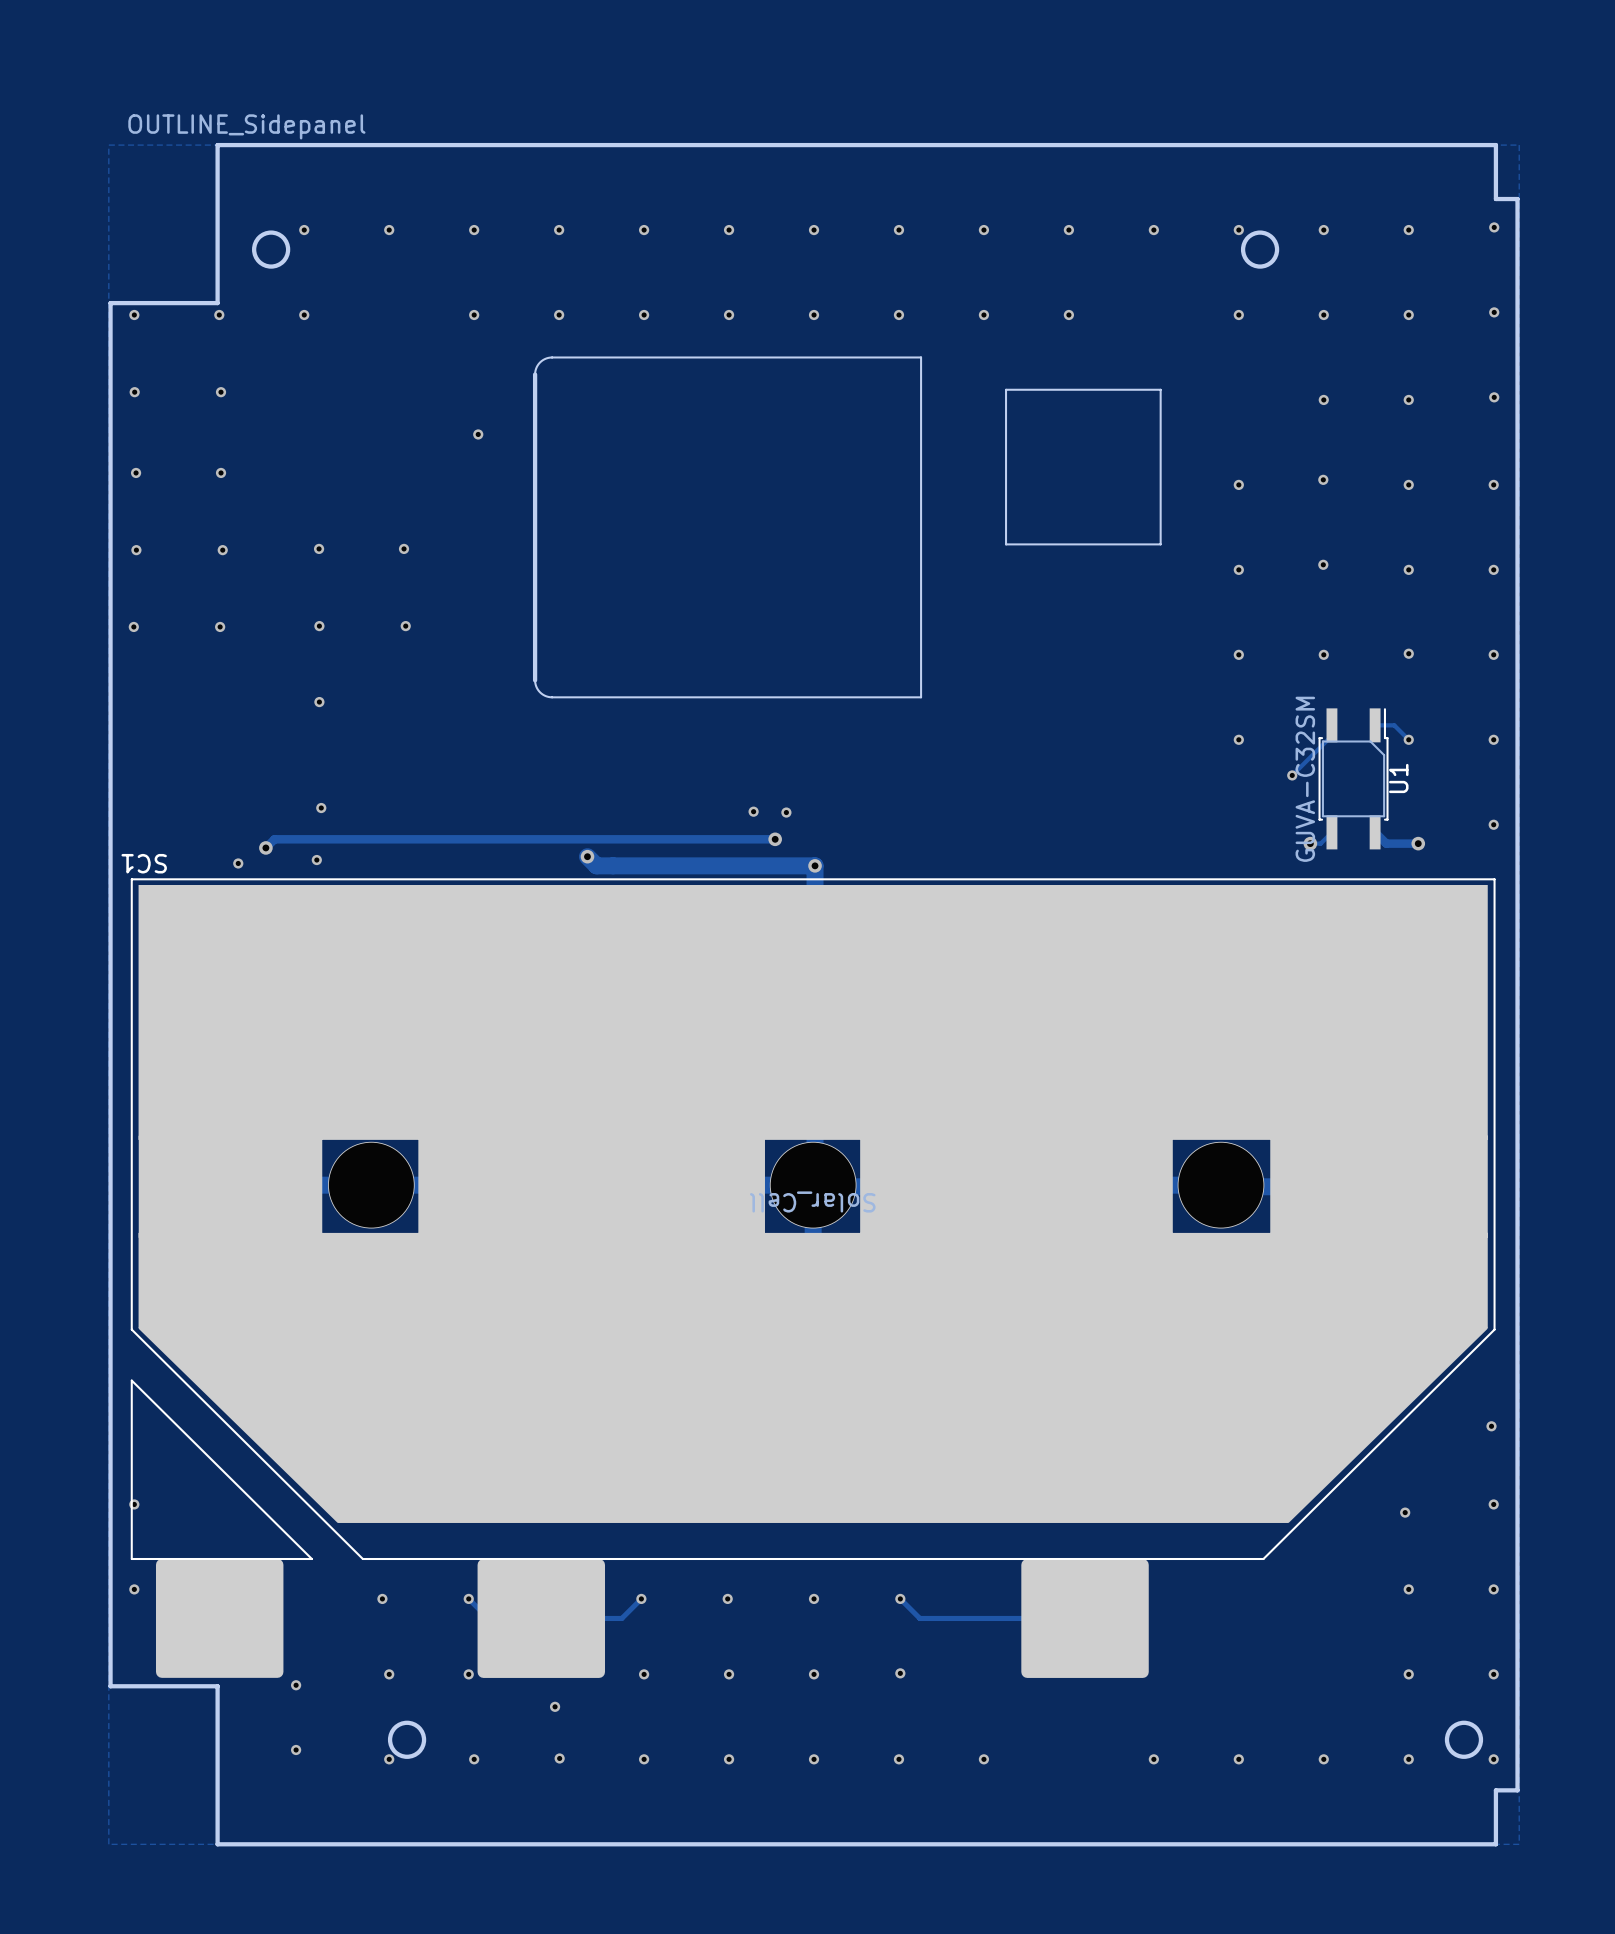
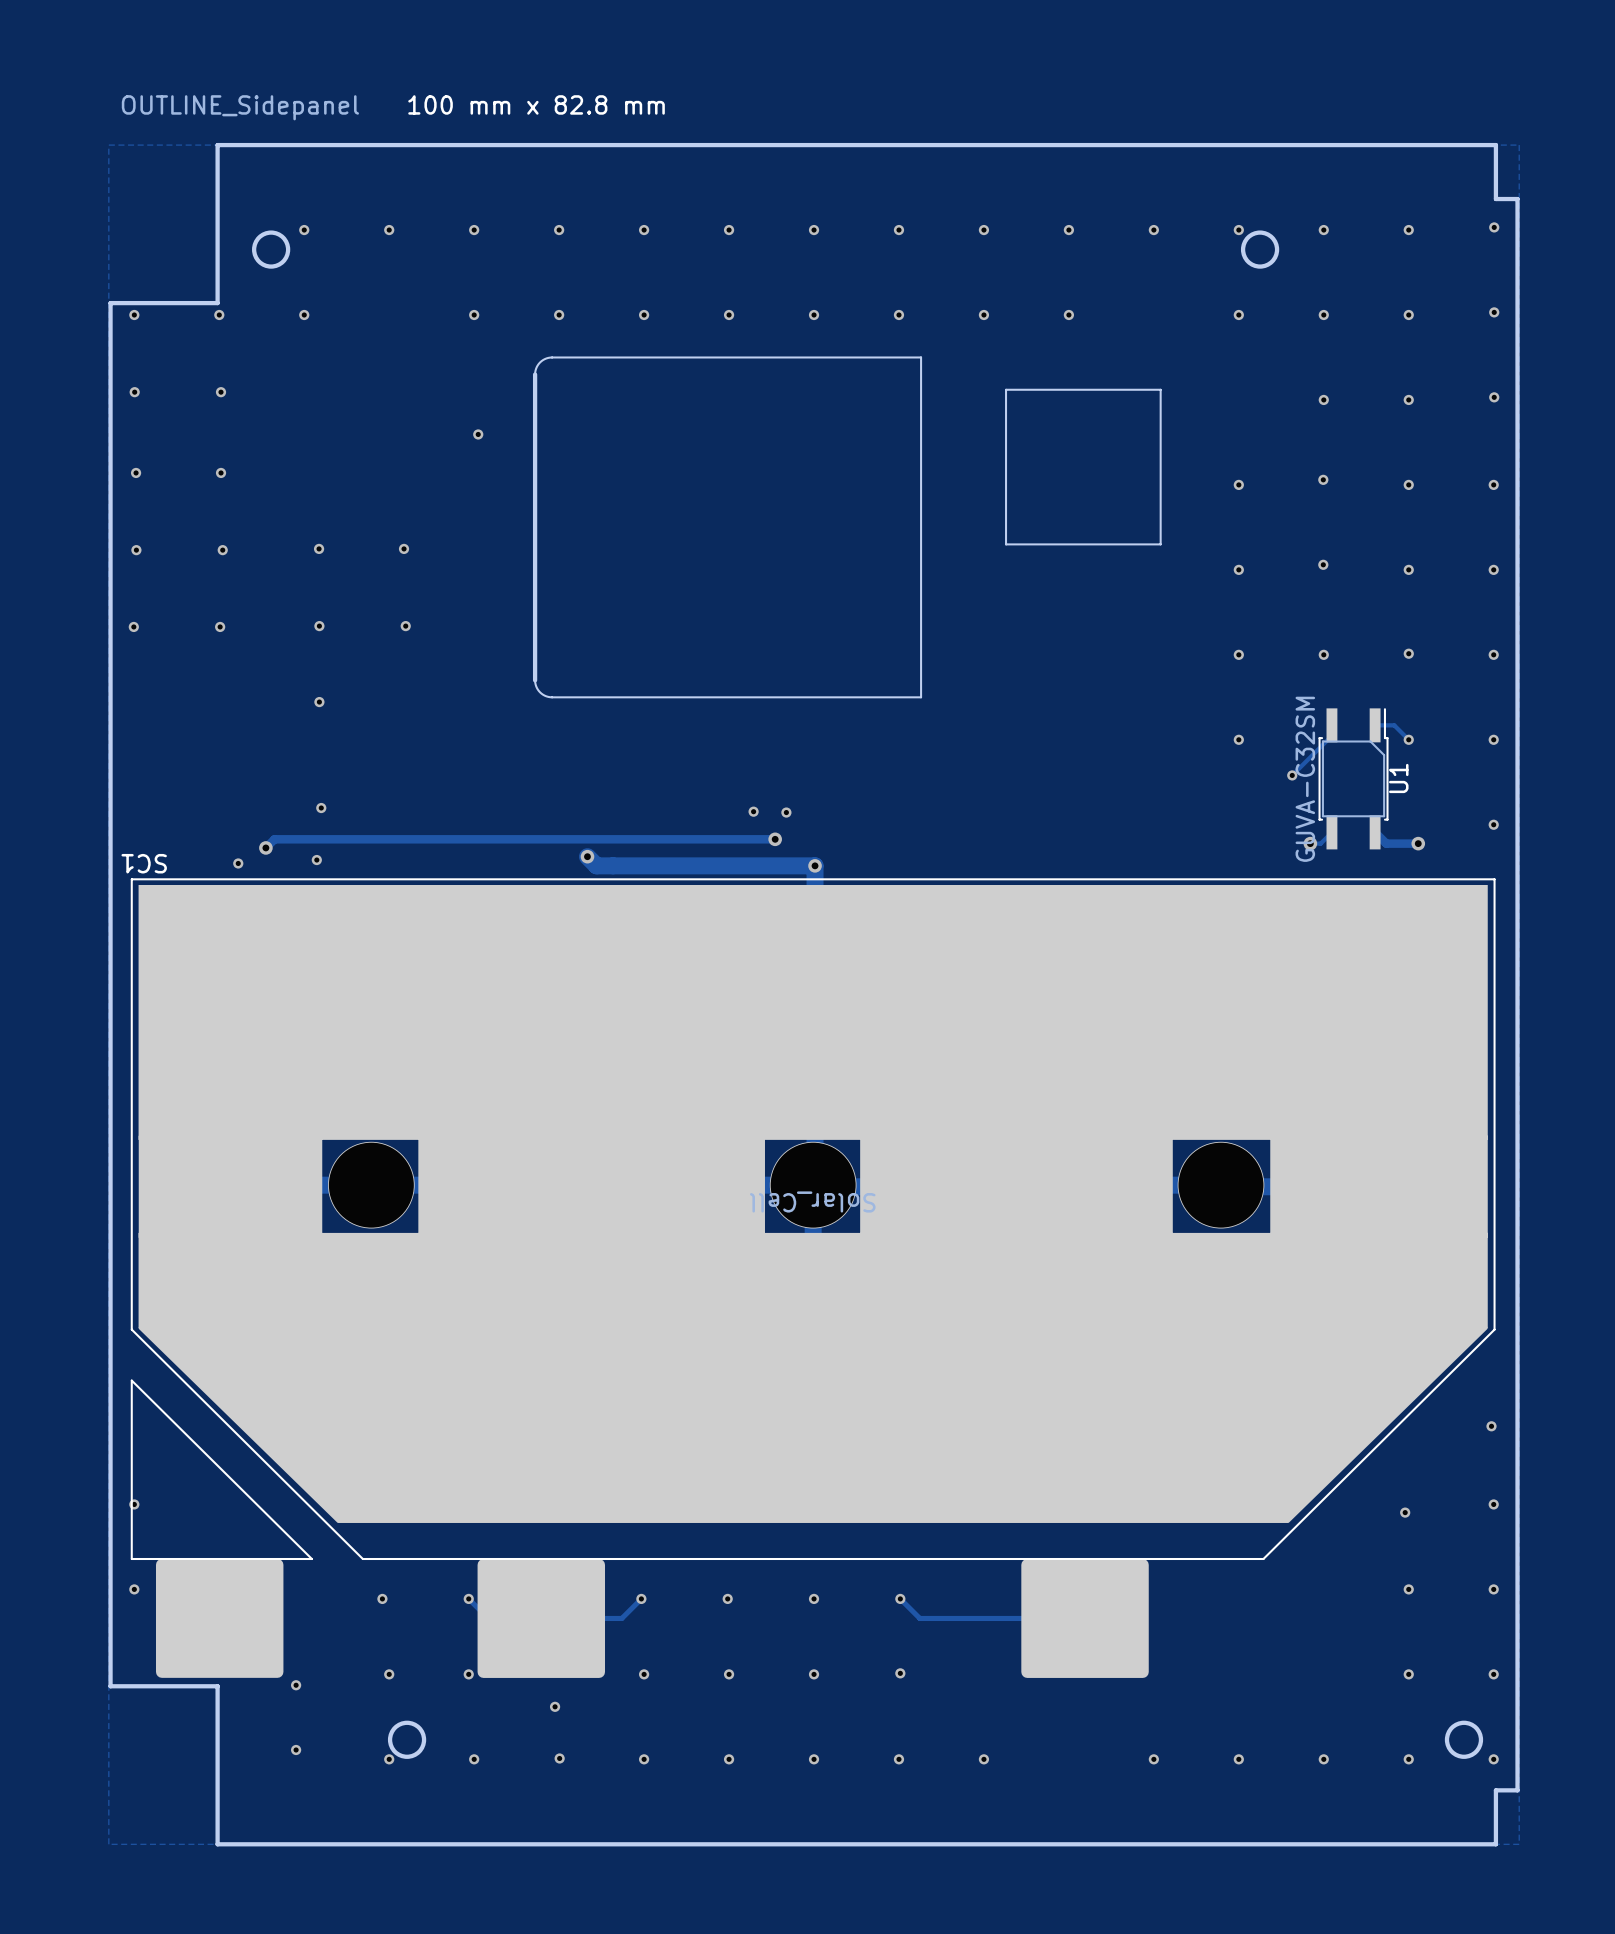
text: none -> 100 mm x 82.8 mm (536, 104)
drawing shape: [108, 114, 1520, 1847] -> [108, 95, 1520, 1847]

